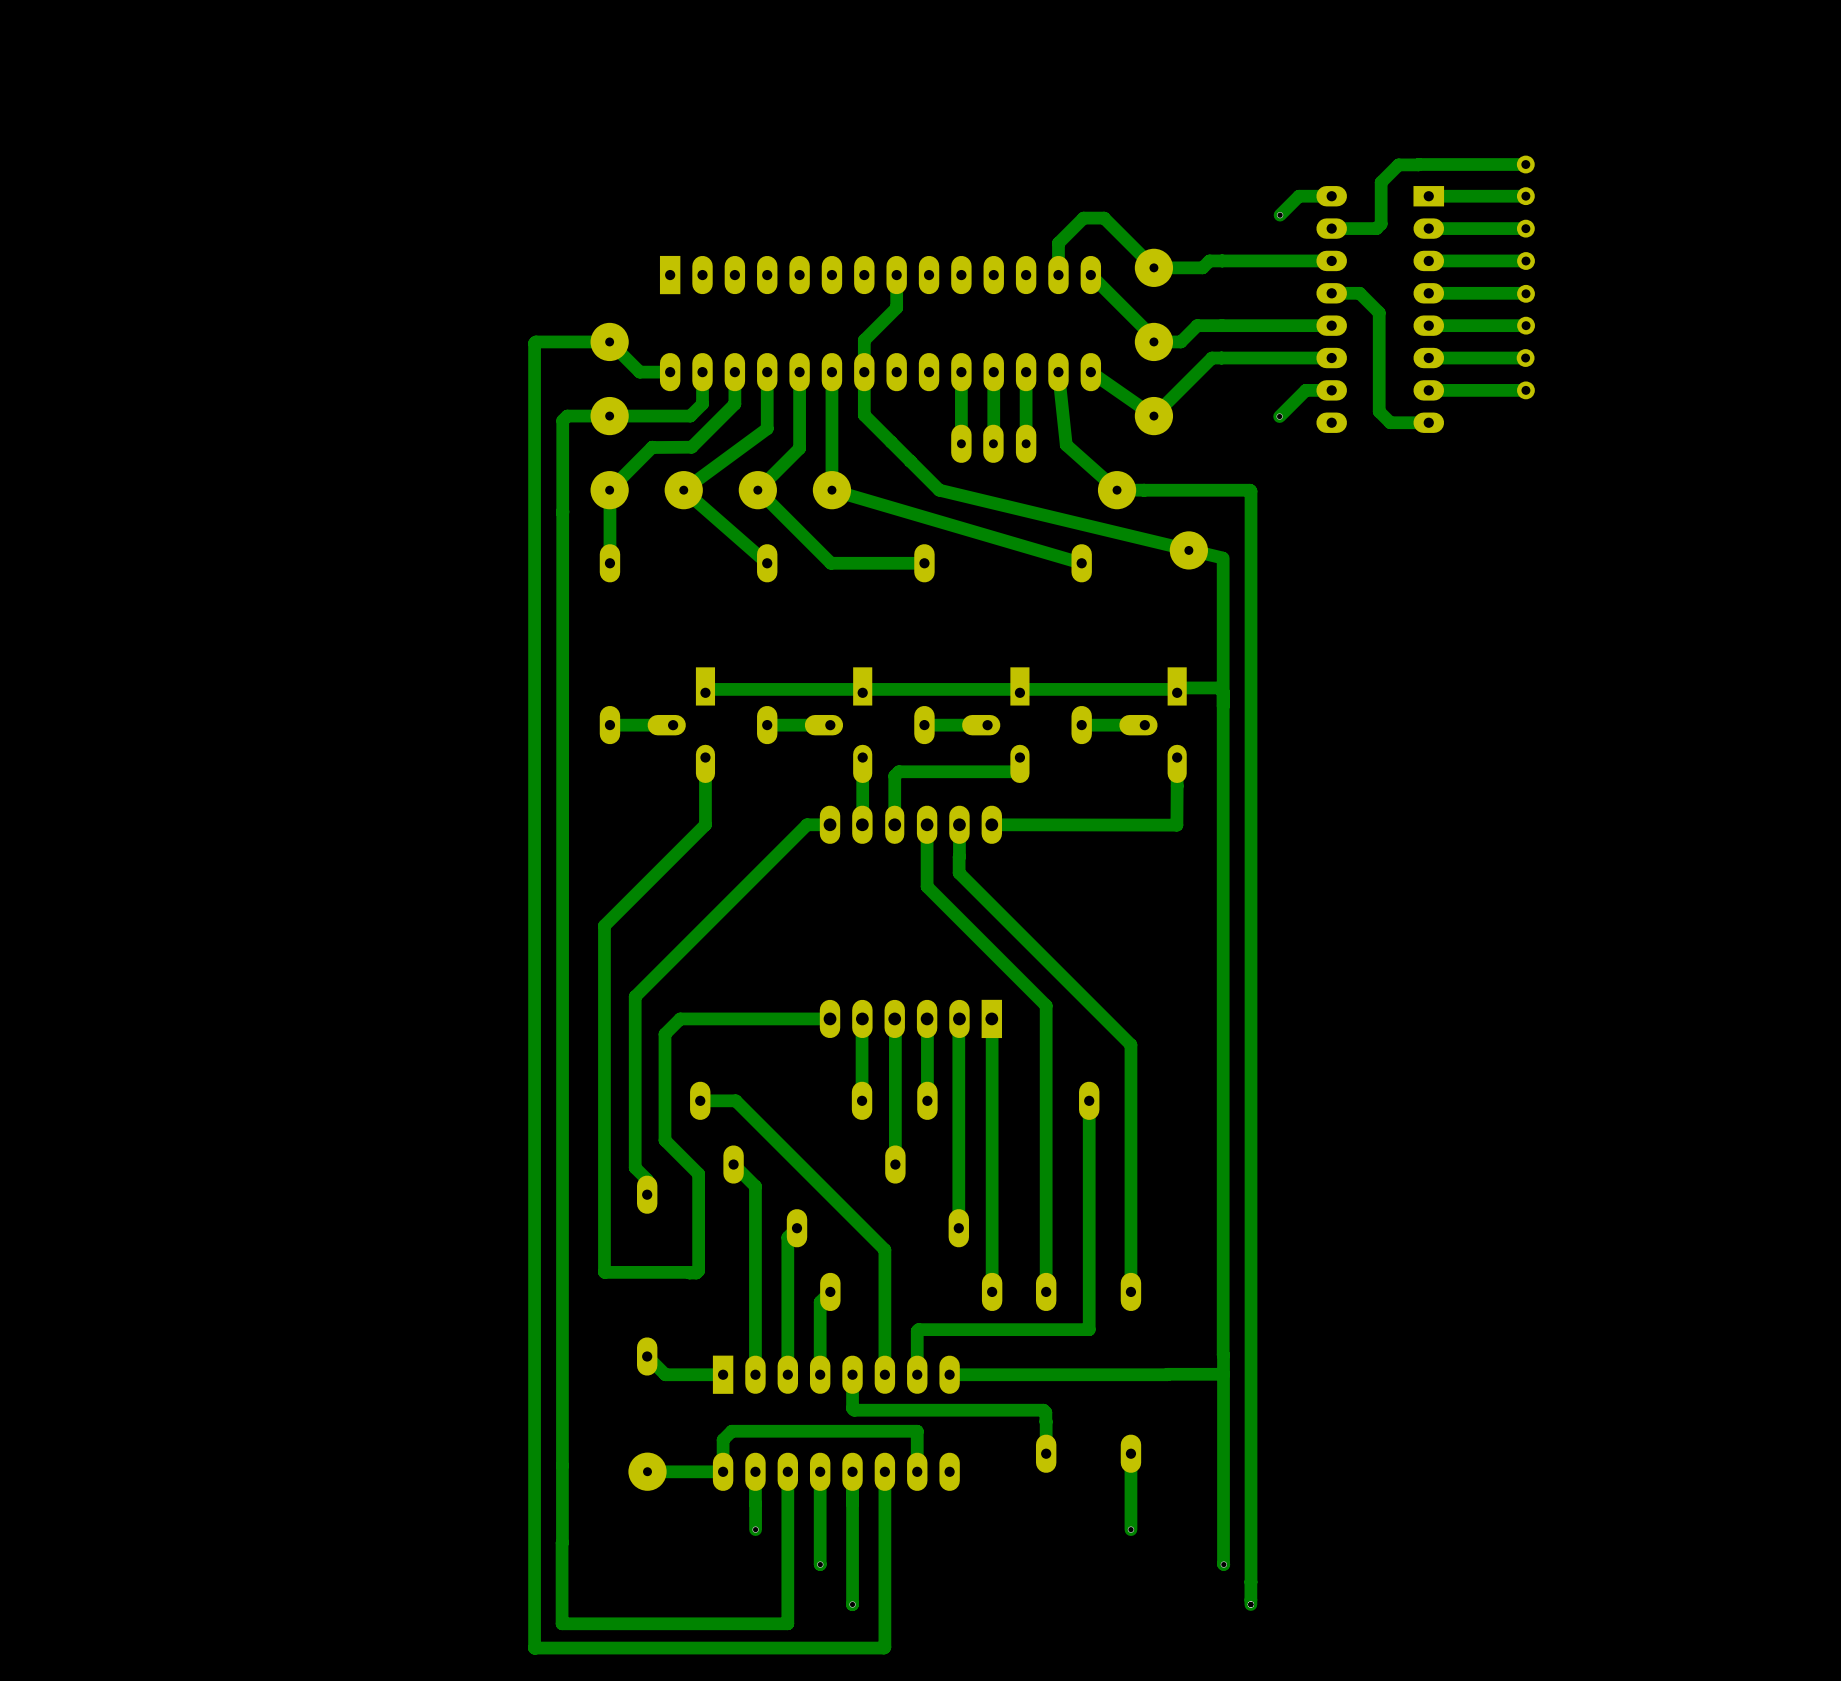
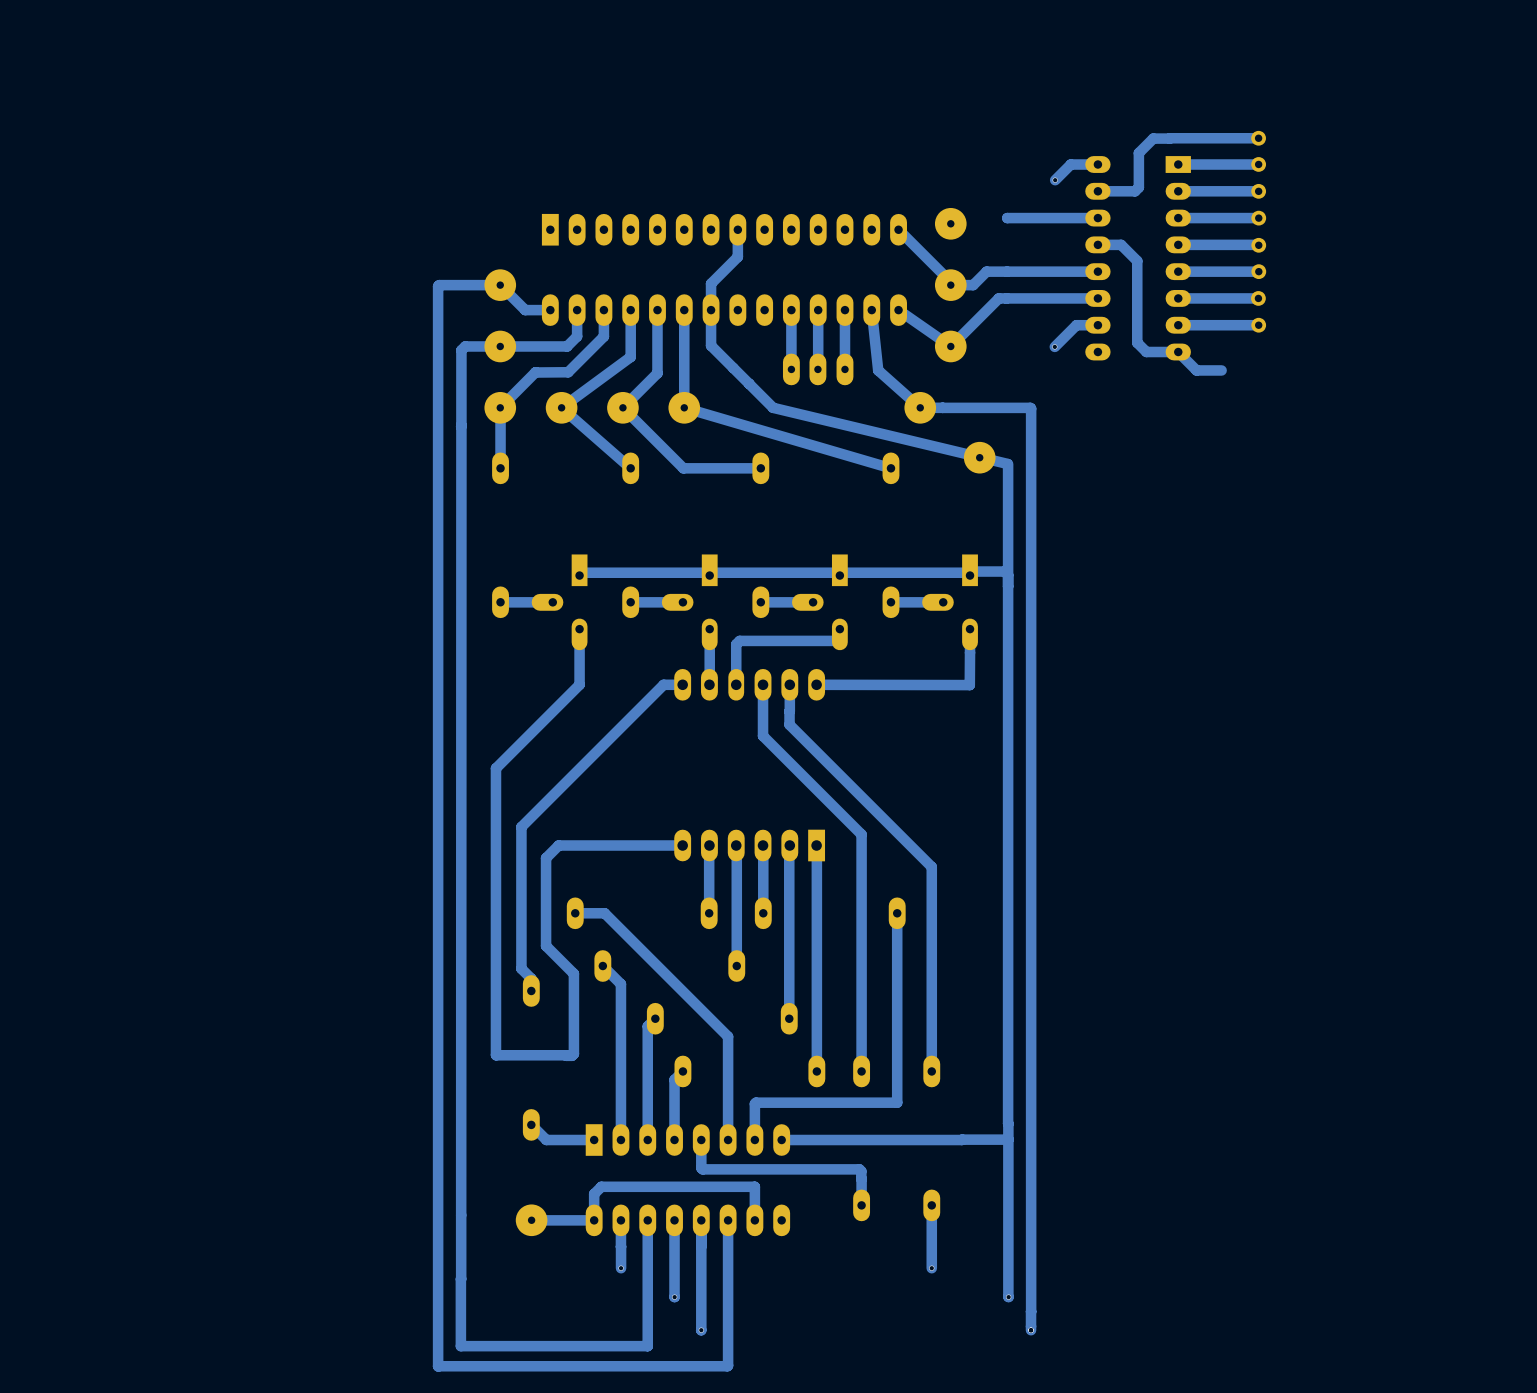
track: (1222, 260) (1209, 260) (1202, 267) (1153, 267) (1104, 218) (1083, 218) (1058, 243) (1058, 275) -> none
track: none -> (1178, 352) (1196, 370) (1221, 370)

